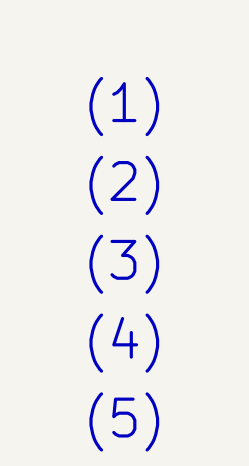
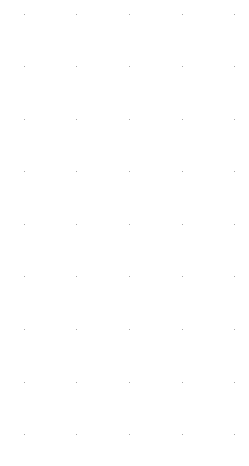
text: (1) (124, 106) -> none
text: (2) (124, 185) -> none
text: (3) (124, 264) -> none
text: (4) (124, 343) -> none
text: (5) (124, 421) -> none

